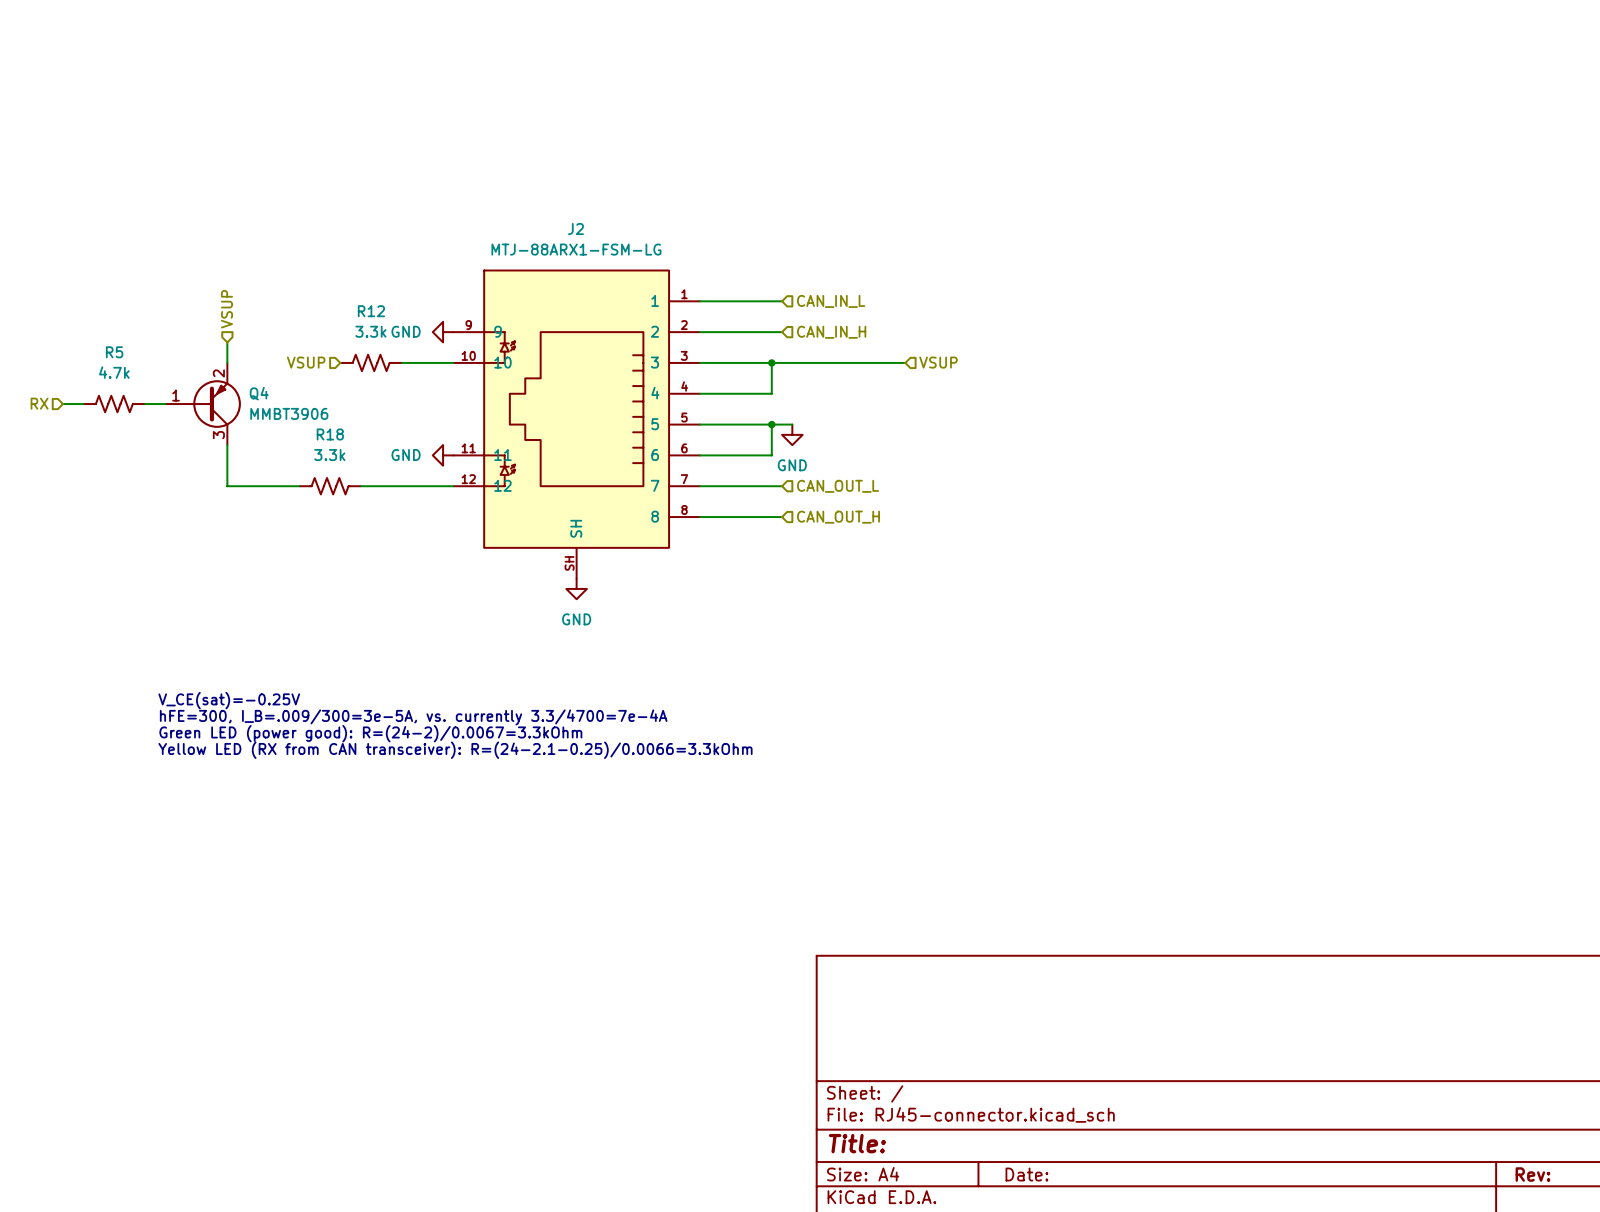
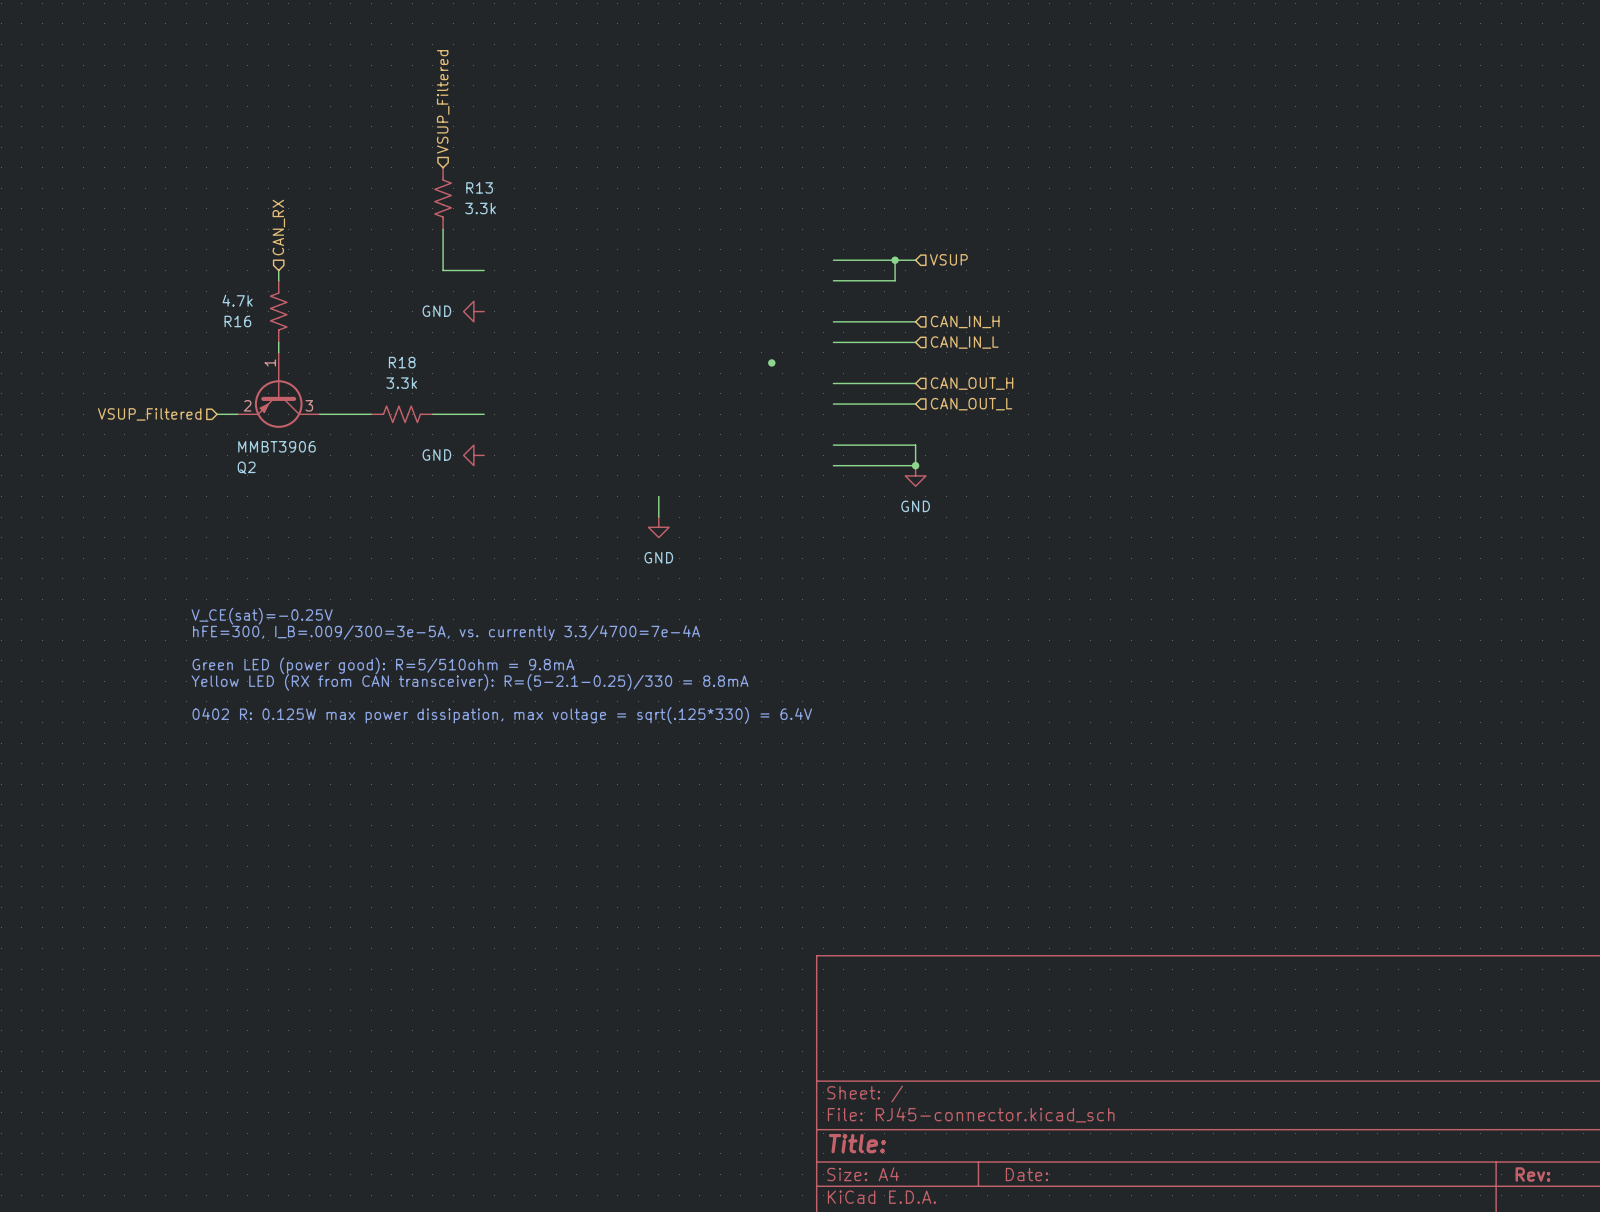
hierarchical label: none -> VSUP_Filtered (443, 101)
R13: none -> 3.3k (443, 198)
hierarchical label: none -> CAN_RX (278, 227)
wire: none -> (443, 229) (443, 270) (484, 270)
wire: none -> (833, 260) (915, 260)
wire: none -> (895, 260) (895, 280) (833, 280)
junction: none -> (895, 260)
wire: none -> (278, 270) (278, 280)
wire: (699, 301) (782, 301) -> (833, 321) (915, 321)
hierarchical label position: CAN_IN_L (831, 301) -> CAN_IN_L (964, 342)
hierarchical label: VSUP (226, 309) -> none
R16: none -> 4.7k (278, 311)
power symbol position: GND (443, 332) -> GND (473, 311)
wire: (699, 332) (782, 332) -> (833, 342) (915, 342)
hierarchical label position: CAN_IN_H (831, 332) -> CAN_IN_H (965, 321)
wire: (227, 342) (227, 362) -> none
wire: none -> (278, 342) (278, 352)
hierarchical label: VSUP (306, 362) -> none
R12: 3.3k (371, 362) -> none
wire: (401, 362) (453, 362) -> (432, 414) (484, 414)
wire: (699, 362) (905, 362) -> none
wire: (771, 362) (771, 393) (699, 393) -> none
hierarchical label position: VSUP (938, 362) -> VSUP (948, 259)
Q2: none -> MMBT3906 (278, 390)
hierarchical label: RX (39, 403) -> none
wire: (62, 404) (83, 404) -> none
R5: 4.7k (114, 404) -> none
wire: (145, 404) (165, 404) -> (217, 414) (237, 414)
Q4: MMBT3906 (203, 404) -> none
hierarchical label: none -> VSUP_Filtered (149, 414)
wire: none -> (319, 414) (371, 414)
J2: MTJ-88ARX1-FSM-LG (576, 424) -> none
wire: (699, 424) (792, 424) -> none
wire: (771, 424) (771, 455) (699, 455) -> none
junction: (771, 424) -> none
power symbol: GND (792, 434) -> none
wire: (227, 445) (227, 486) (299, 486) -> none
wire: none -> (833, 445) (915, 445) (915, 465) (833, 465)
power symbol position: GND (443, 455) -> GND (473, 455)
junction: none -> (915, 465)
power symbol: none -> GND (915, 475)
R18 position: (330, 486) -> (401, 414)
wire: (360, 486) (453, 486) -> none
wire: (699, 486) (782, 486) -> (833, 404) (915, 404)
hierarchical label position: CAN_OUT_L (837, 486) -> CAN_OUT_L (971, 404)
wire: (699, 517) (782, 517) -> (833, 383) (915, 383)
hierarchical label position: CAN_OUT_H (838, 517) -> CAN_OUT_H (972, 383)
power symbol: none -> GND (658, 527)
power symbol: GND (576, 588) -> none
text: none -> Green LED (power good): R=5/510ohm = 9.8mA (383, 665)
text: none -> Yellow LED (RX from CAN transceiver): R=(5-2.1-0.25)/330 = 8.8mA (470, 682)
text position: V_CE(sat)=-0.25V (229, 700) -> V_CE(sat)=-0.25V (262, 616)
text: none -> 0402 R: 0.125W max power dissipation, max voltage = sqrt(.125*330) = 6.4V (502, 715)
text position: hFE=300, I_B=.009/300=3e-5A, vs. currently 3.3/4700=7e-4A (413, 717) -> hFE=300, I_B=.009/300=3e-5A, vs. currently 3.3/4700=7e-4A (446, 633)
text: Green LED (power good): R=(24-2)/0.0067=3.3kOhm (370, 733) -> none
text: Yellow LED (RX from CAN transceiver): R=(24-2.1-0.25)/0.0066=3.3kOhm (455, 750) -> none

